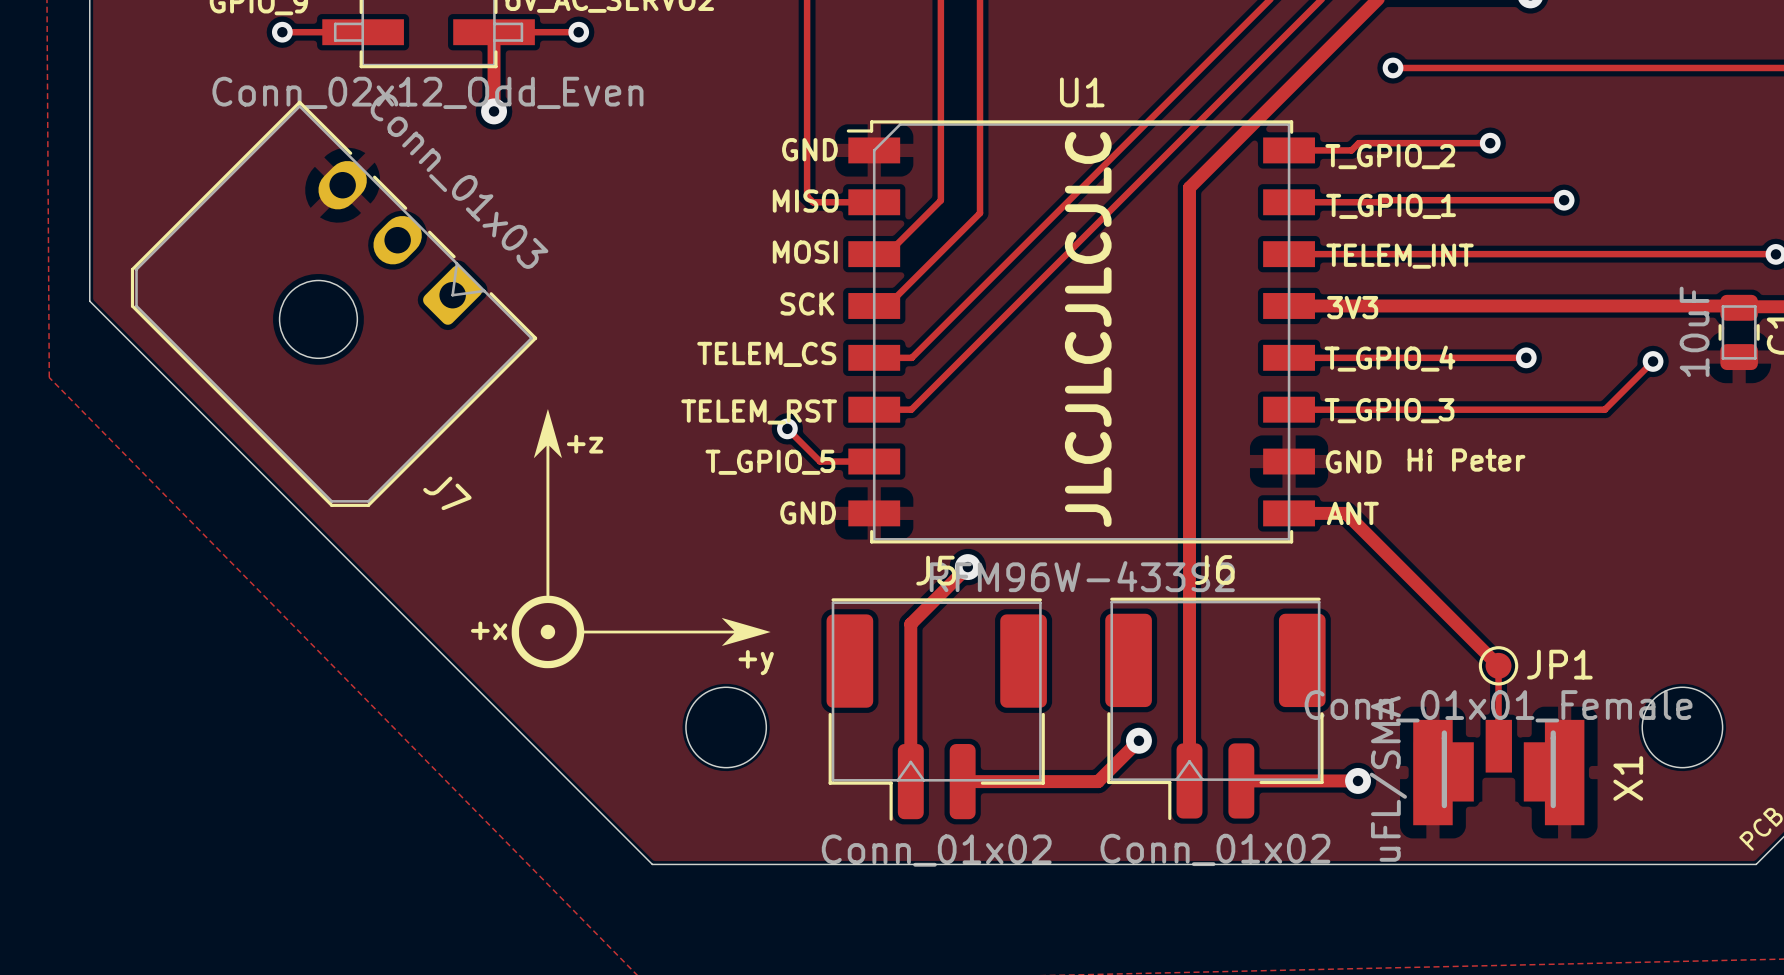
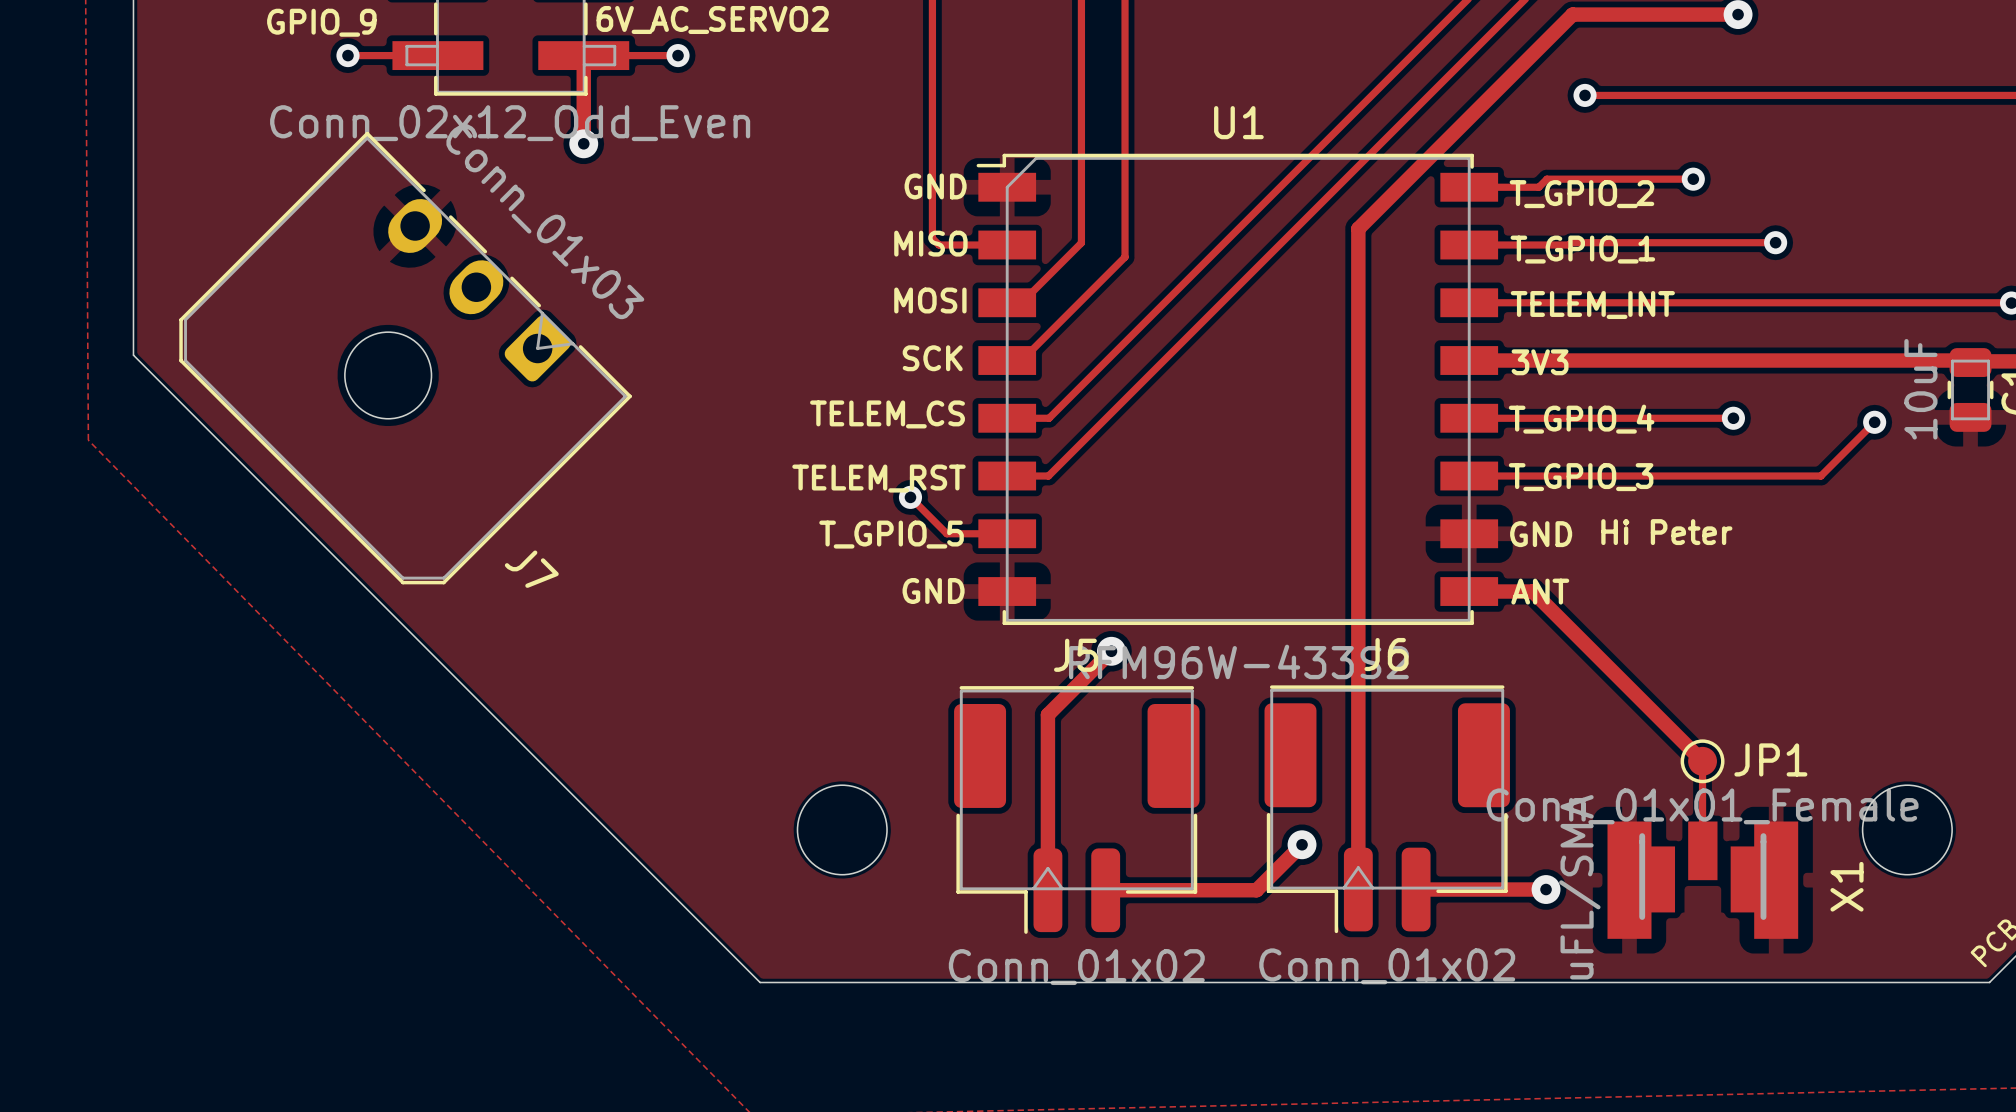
text: JLCJLCJLCJLC (1088, 329) -> none
drawing: [511, 409, 771, 669] -> none
text: +z (585, 444) -> none
text: +x (489, 630) -> none
text: +y (756, 662) -> none

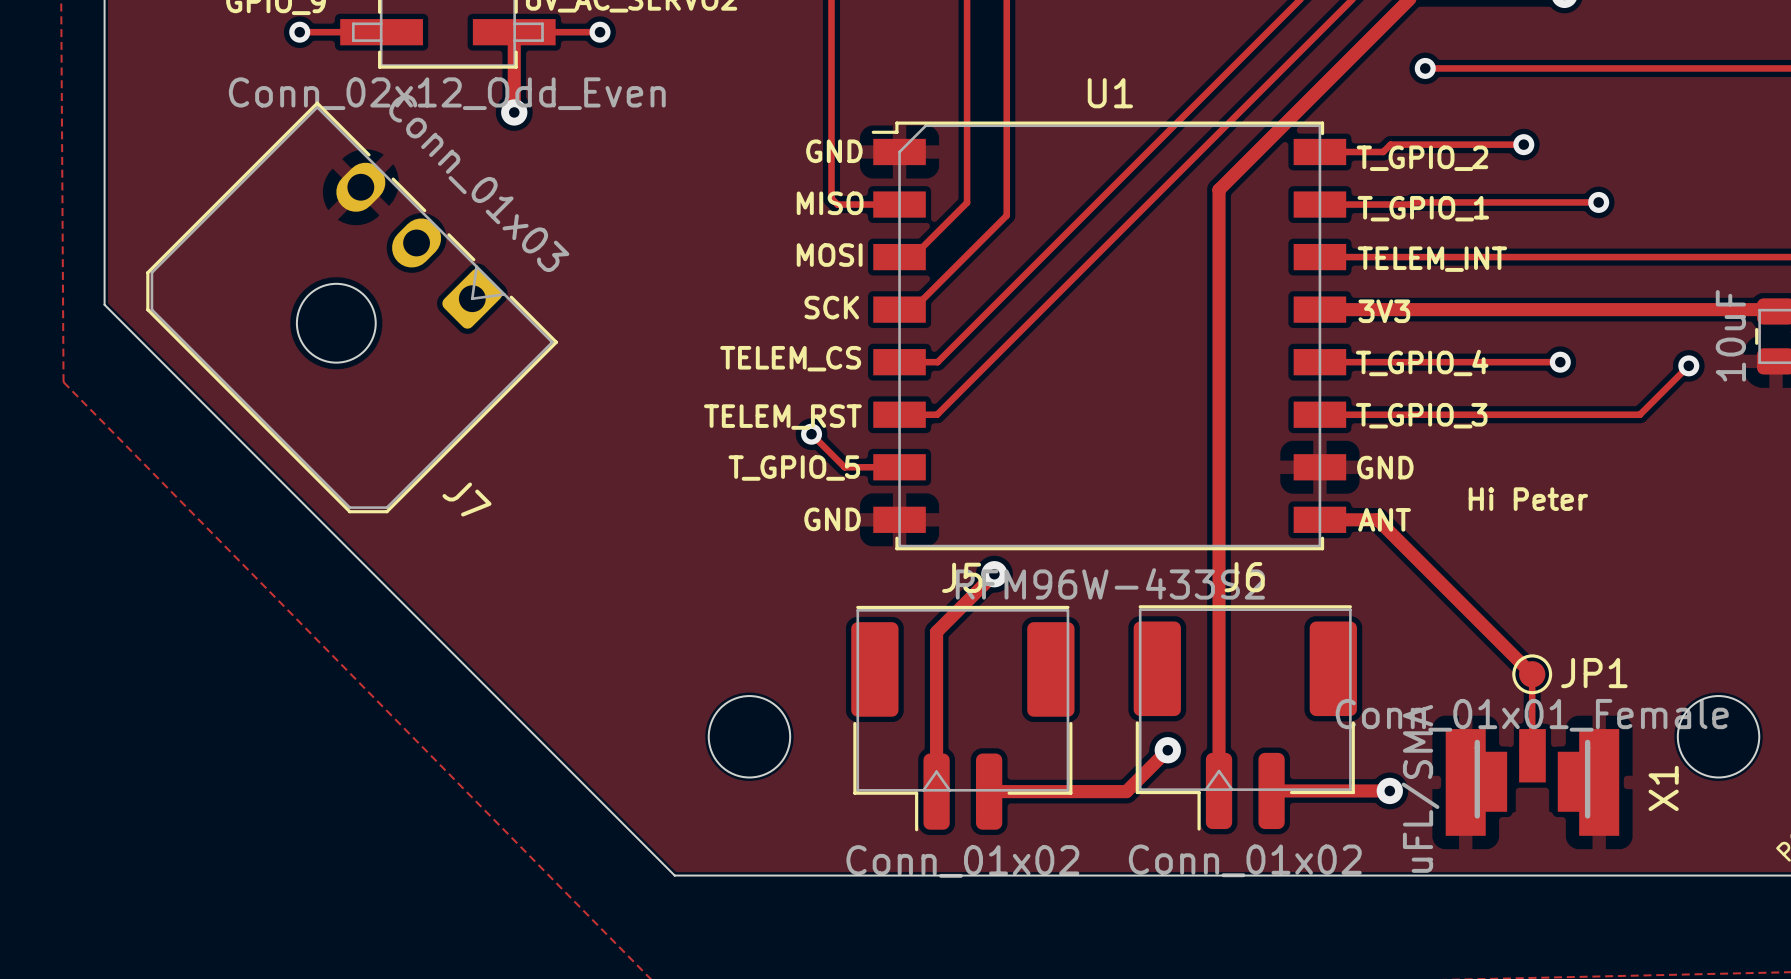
text position: Hi Peter (1666, 532) -> Hi Peter (1528, 499)

